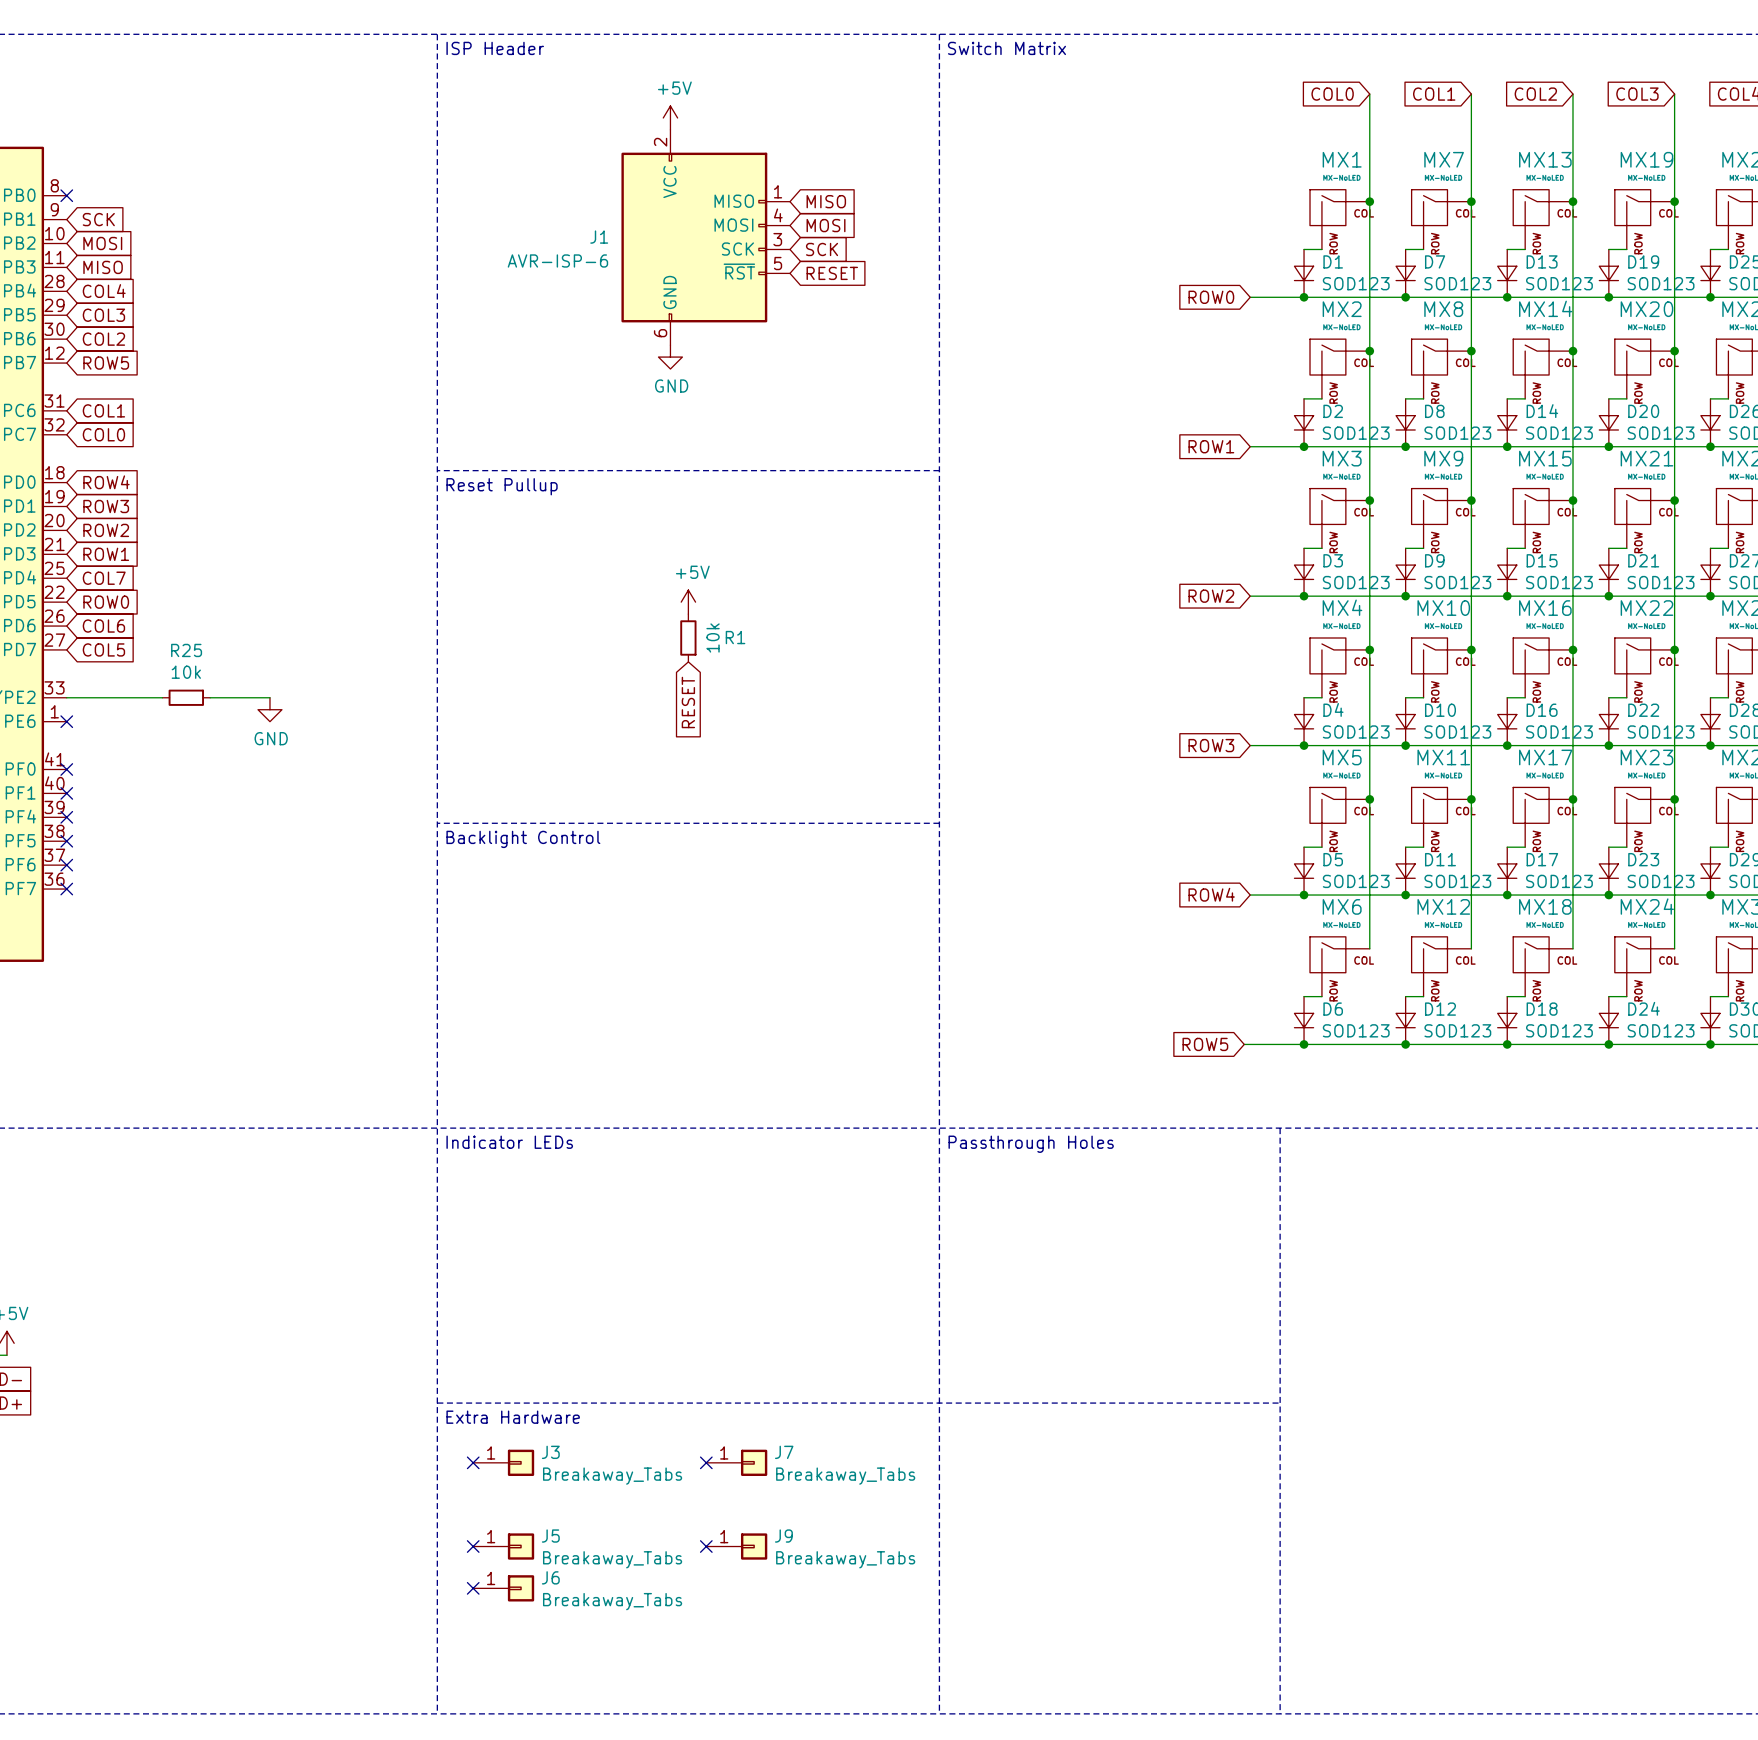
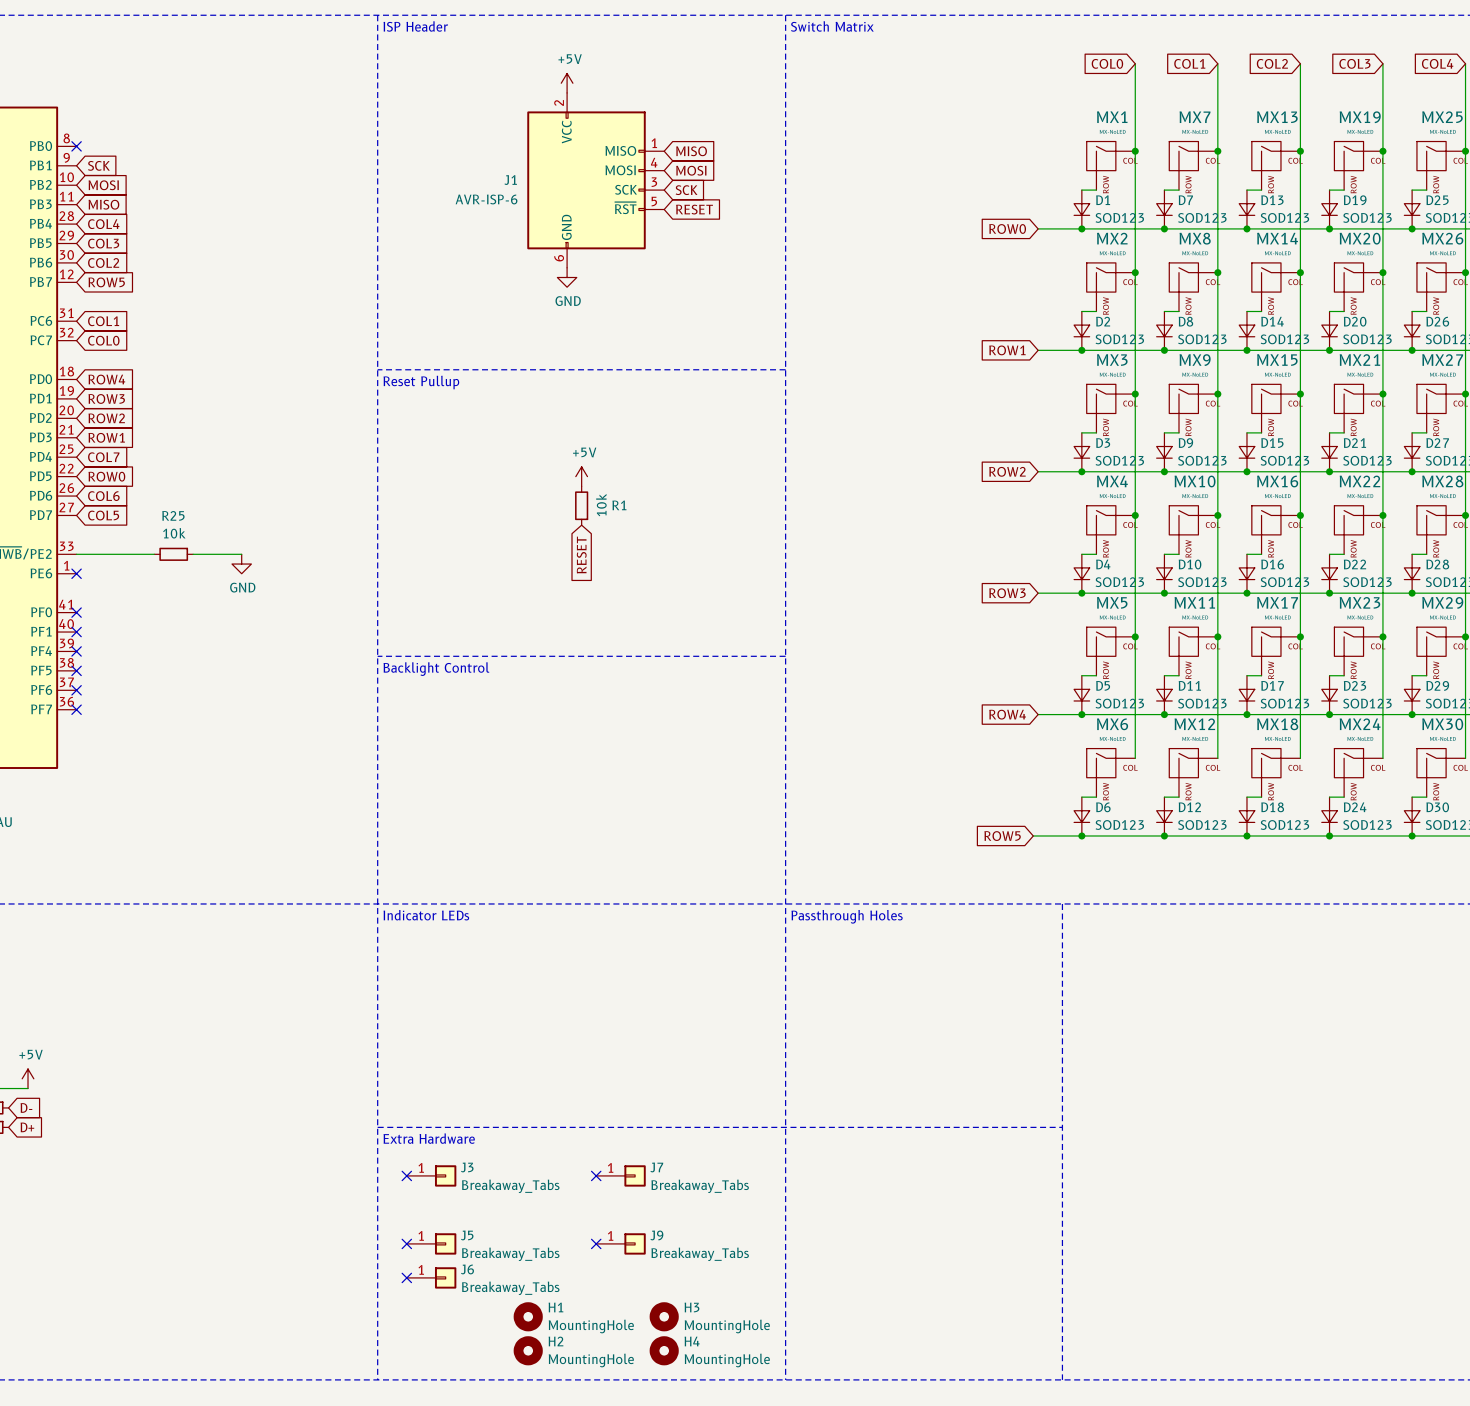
H1: none -> MountingHole (528, 1316)
H3: none -> MountingHole (664, 1316)
H2: none -> MountingHole (528, 1350)
H4: none -> MountingHole (664, 1350)

